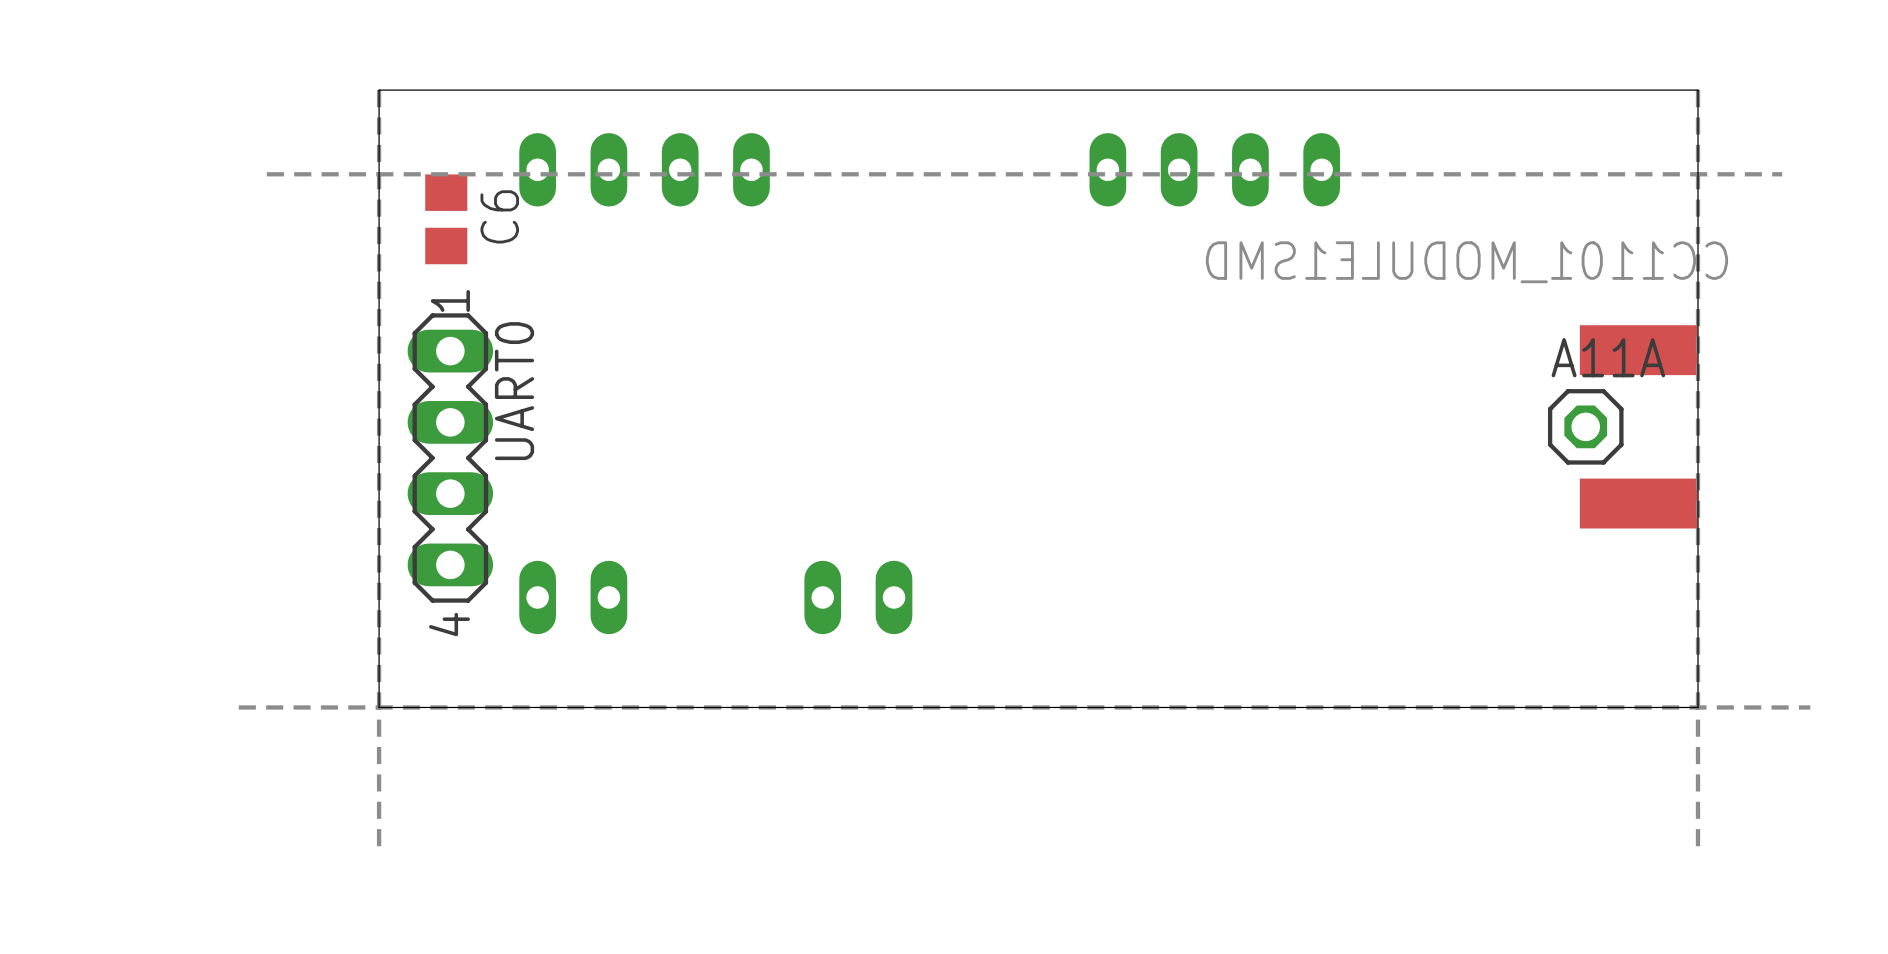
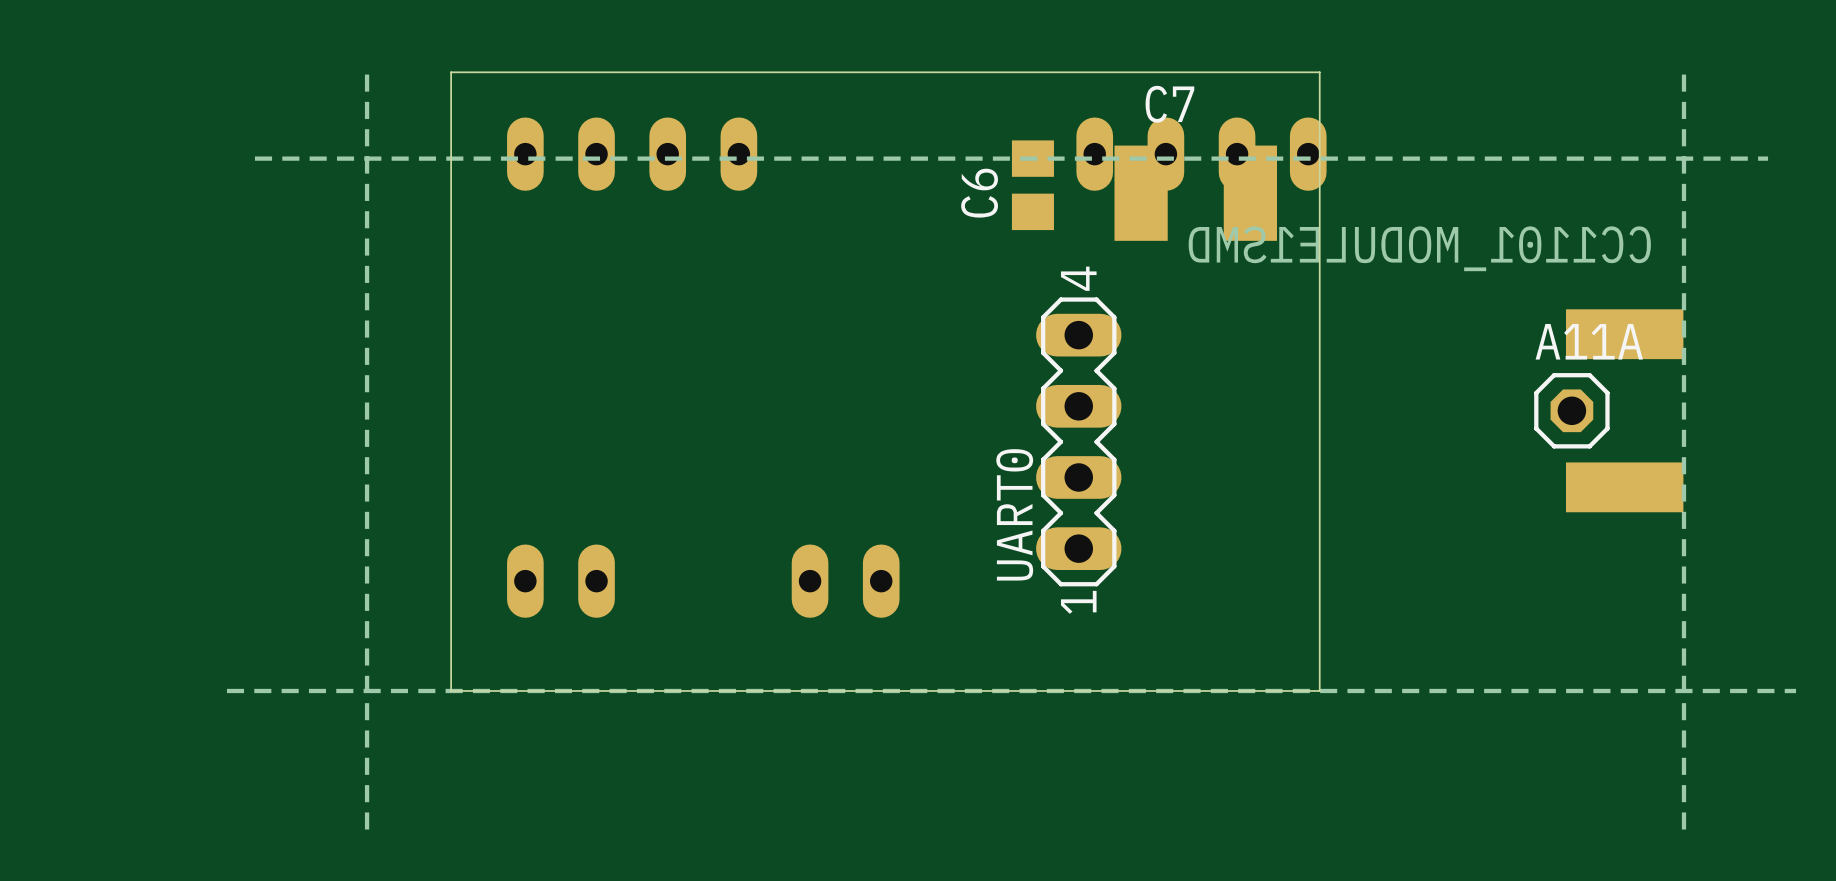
C7: none -> (1195, 193)
C6 name position: C6 (499, 216) -> C6 (979, 193)
C6 position: (446, 219) -> (1032, 185)
UART0 text position: 1 (450, 300) -> 1 (1078, 602)
UART0 name position: UART0 (514, 391) -> UART0 (1014, 514)
UART0 position: (450, 458) -> (1078, 441)
UART0 text position: 4 (449, 624) -> 4 (1078, 278)
board edge: (463, 707) (379, 707) (379, 90) (1698, 90) (1698, 707) (1333, 707) -> (451, 690) (451, 72) (1319, 72) (1319, 690)

